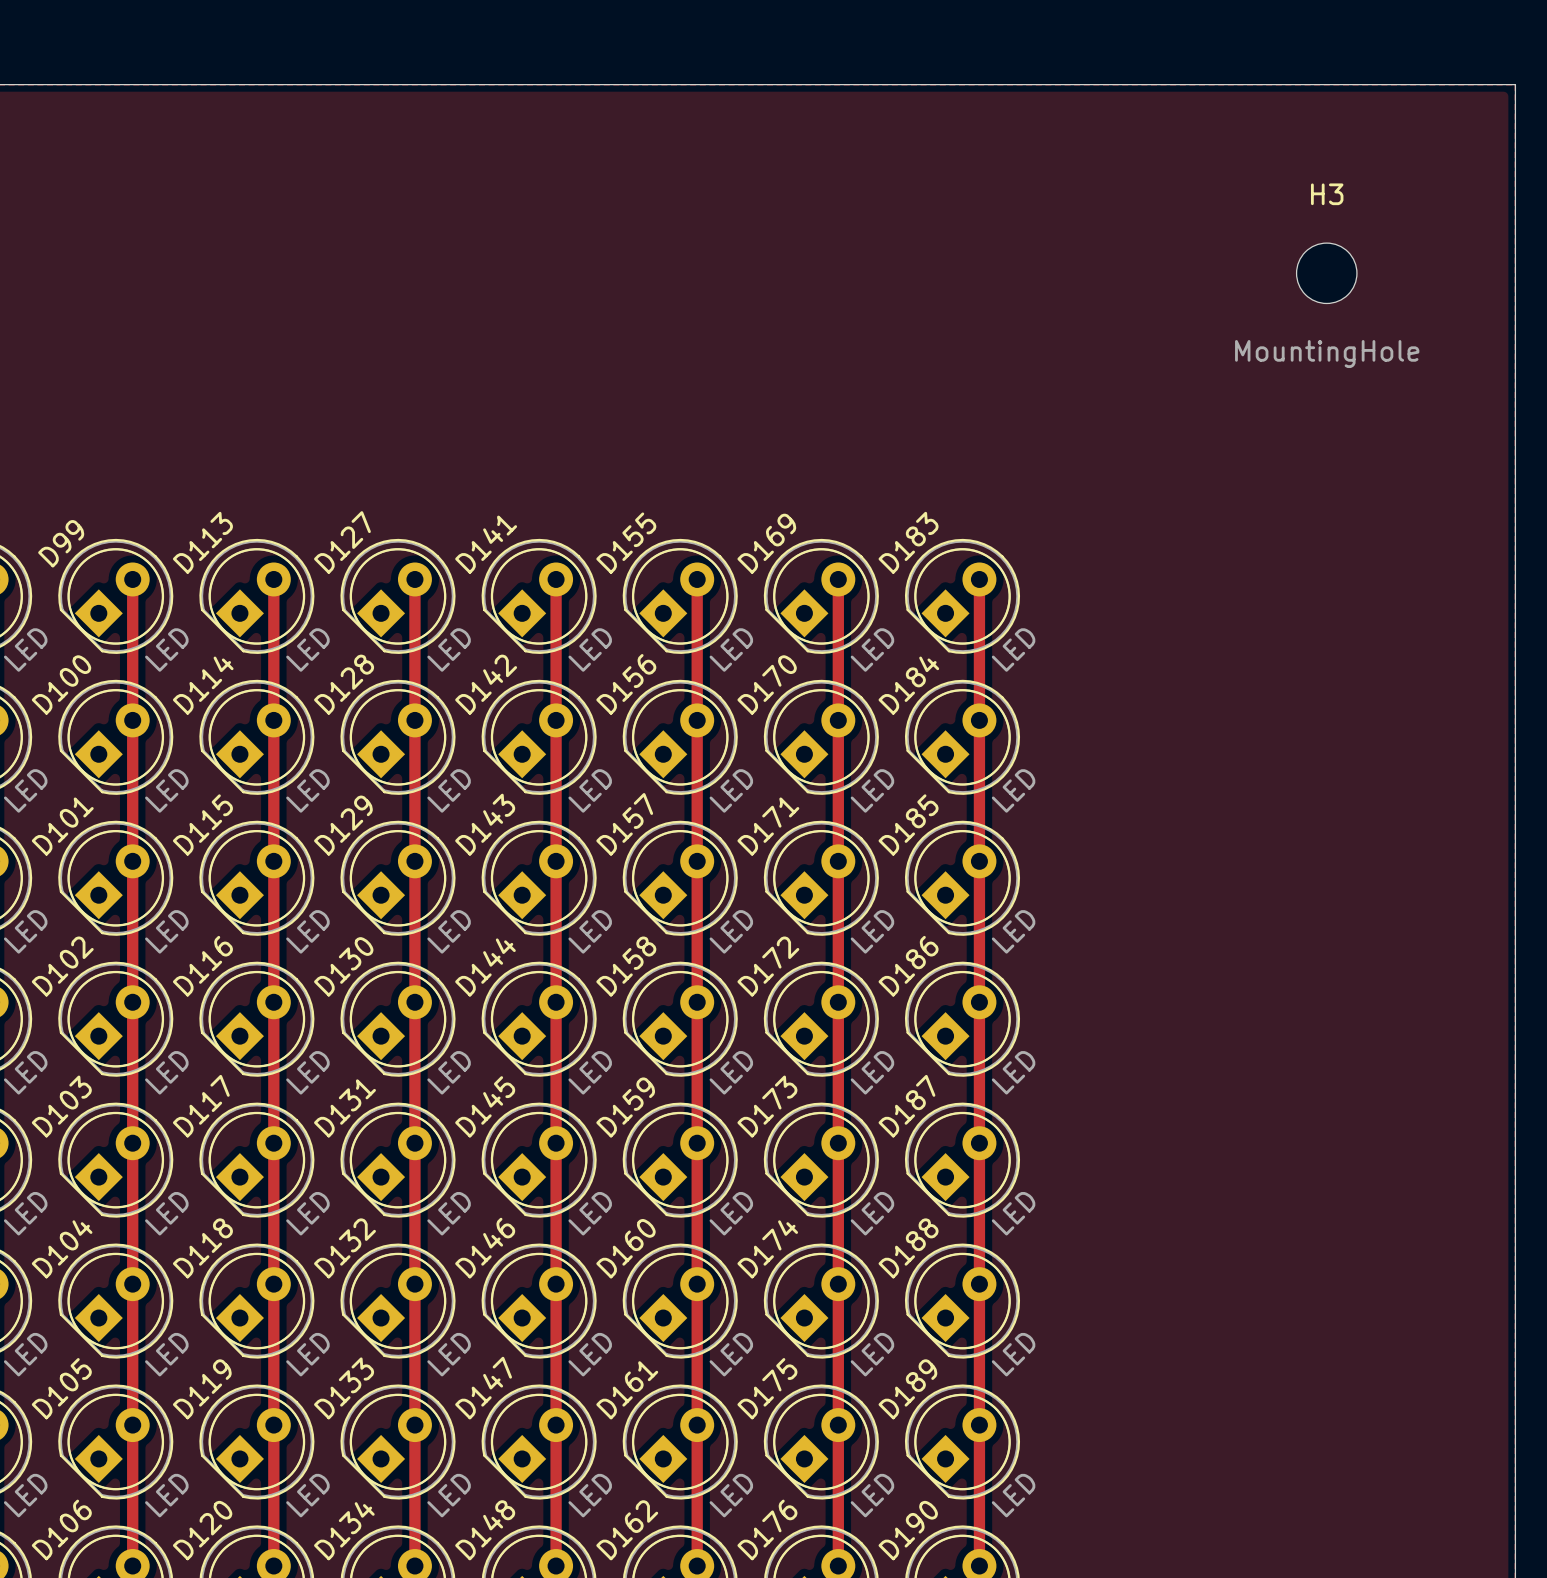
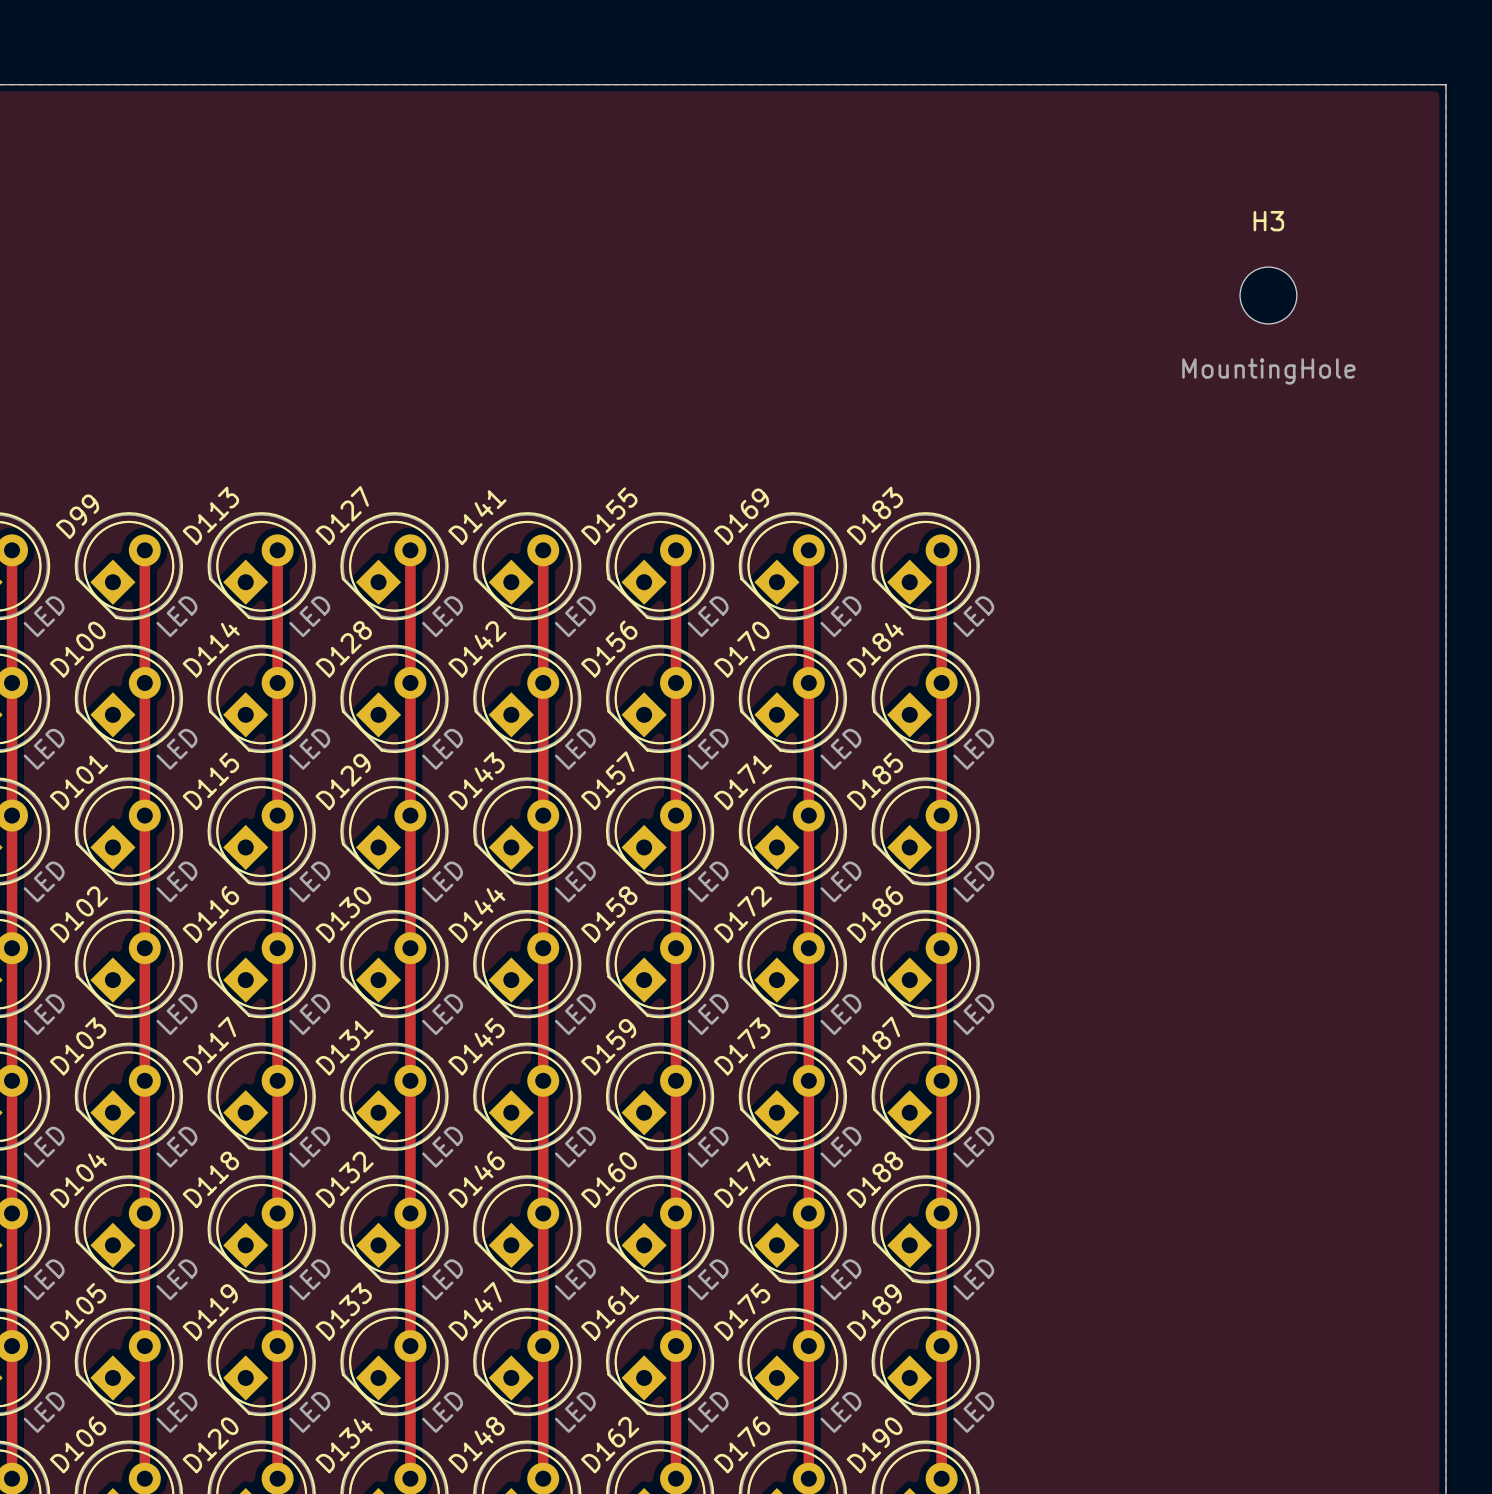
H3 position: (1326, 273) -> (1268, 295)

